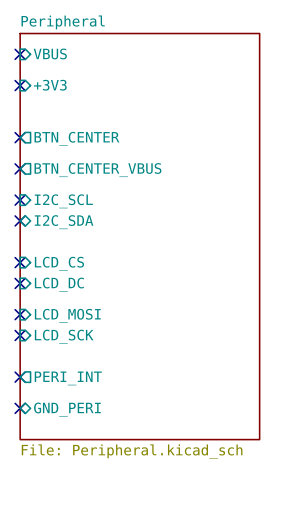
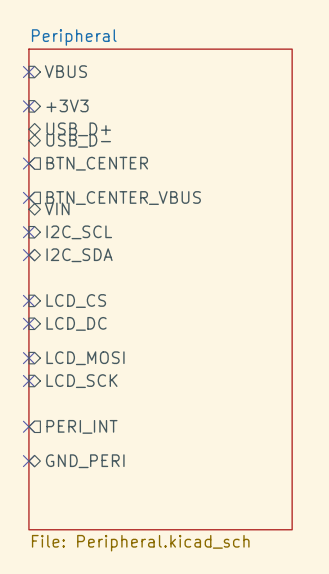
sheet pin: none -> USB_D+ (78, 129)
sheet pin: none -> USB_D- (78, 140)
sheet pin: none -> VIN (57, 208)
sheet Peripheral: File: Peripheral.kicad_sch (139, 236) -> none
sheet Peripheral: none -> File: Peripheral.kicad_sch (160, 289)

